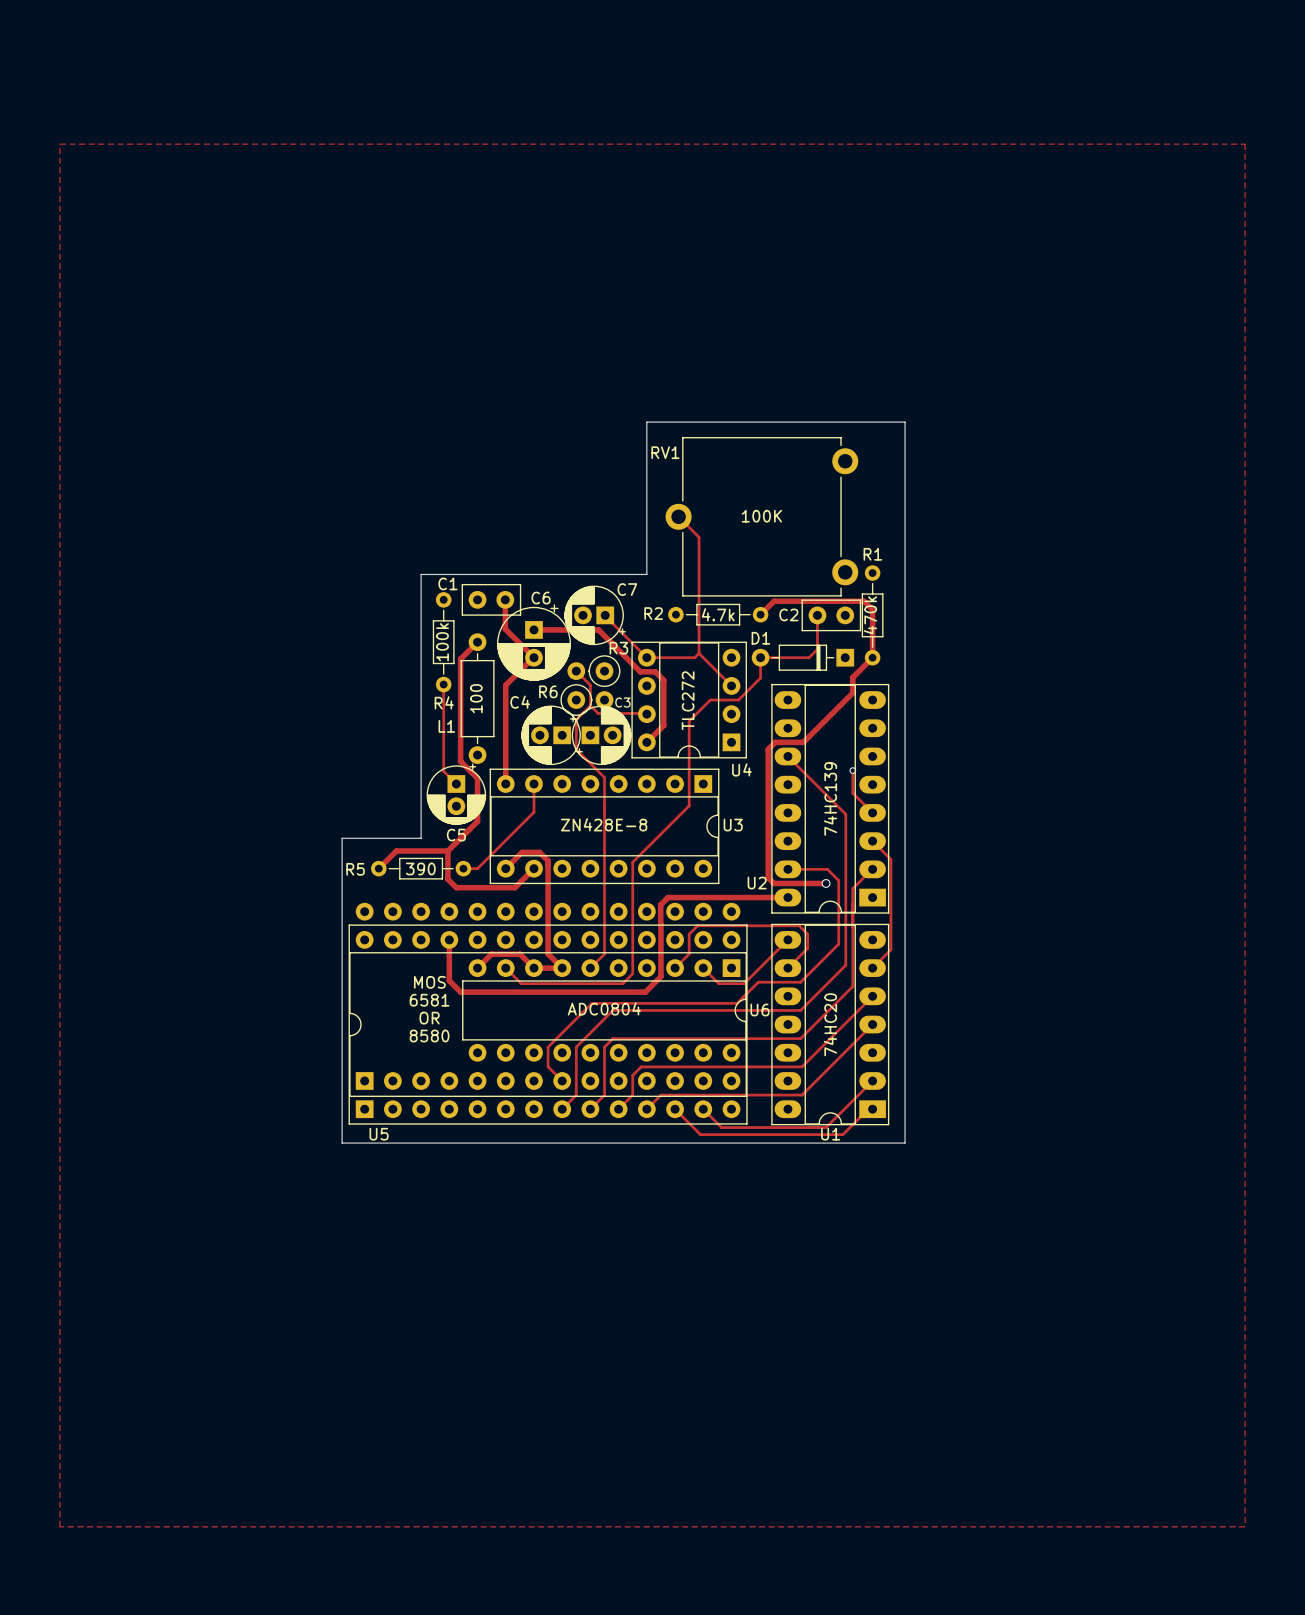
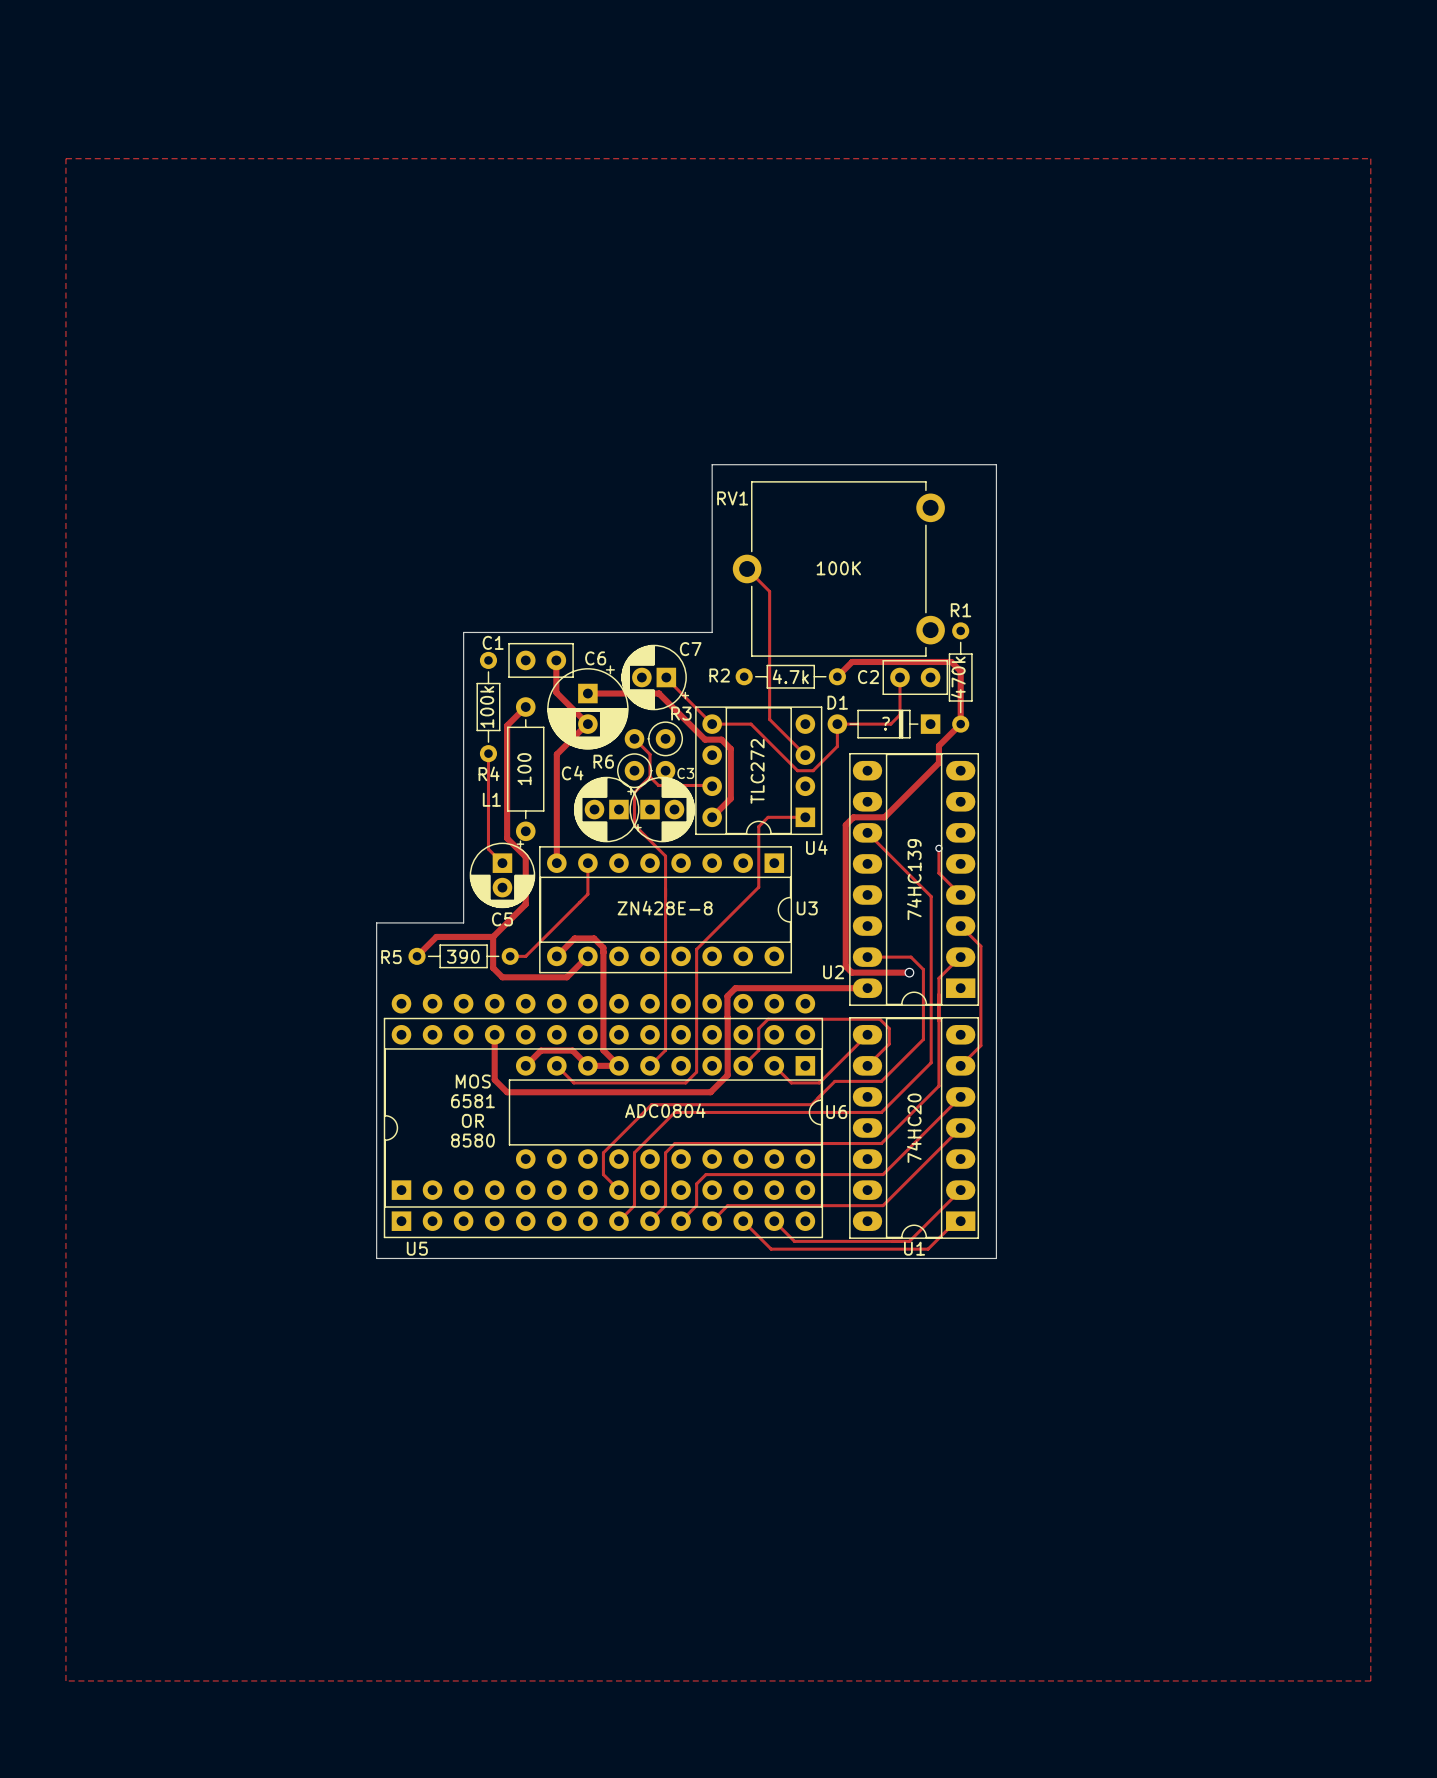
track: (699, 653) (694, 657) (682, 657) -> (797, 770) (750, 724)
text: none -> ? (886, 723)
track: (724, 700) (710, 700) (689, 721) (689, 750) -> (805, 817) (768, 817) (758, 826)

